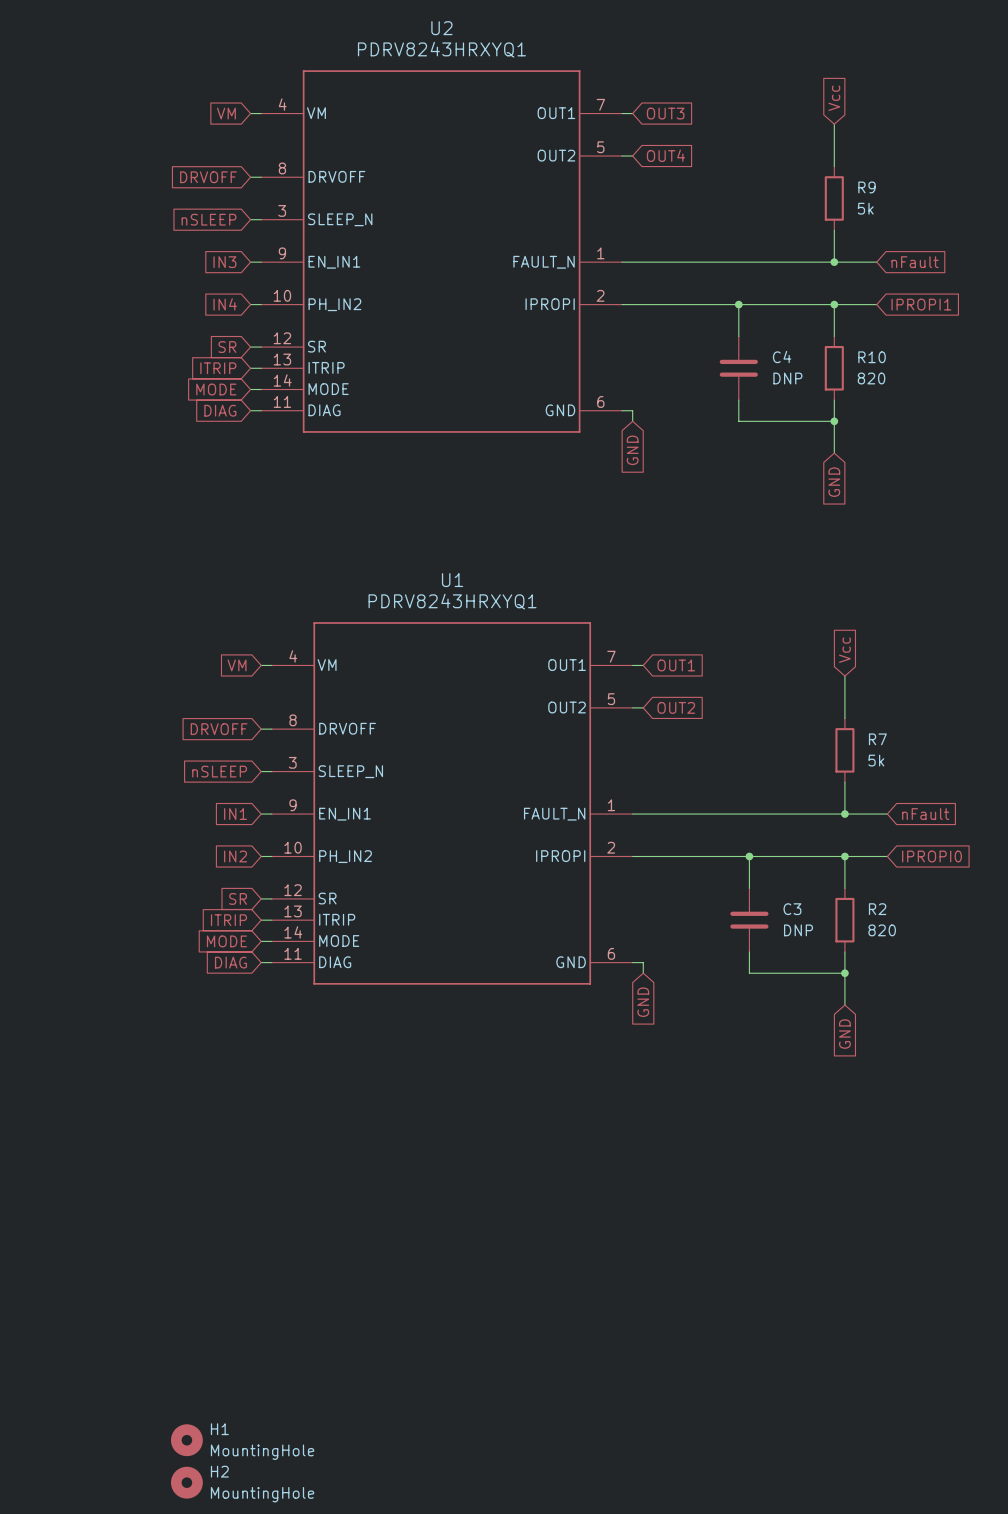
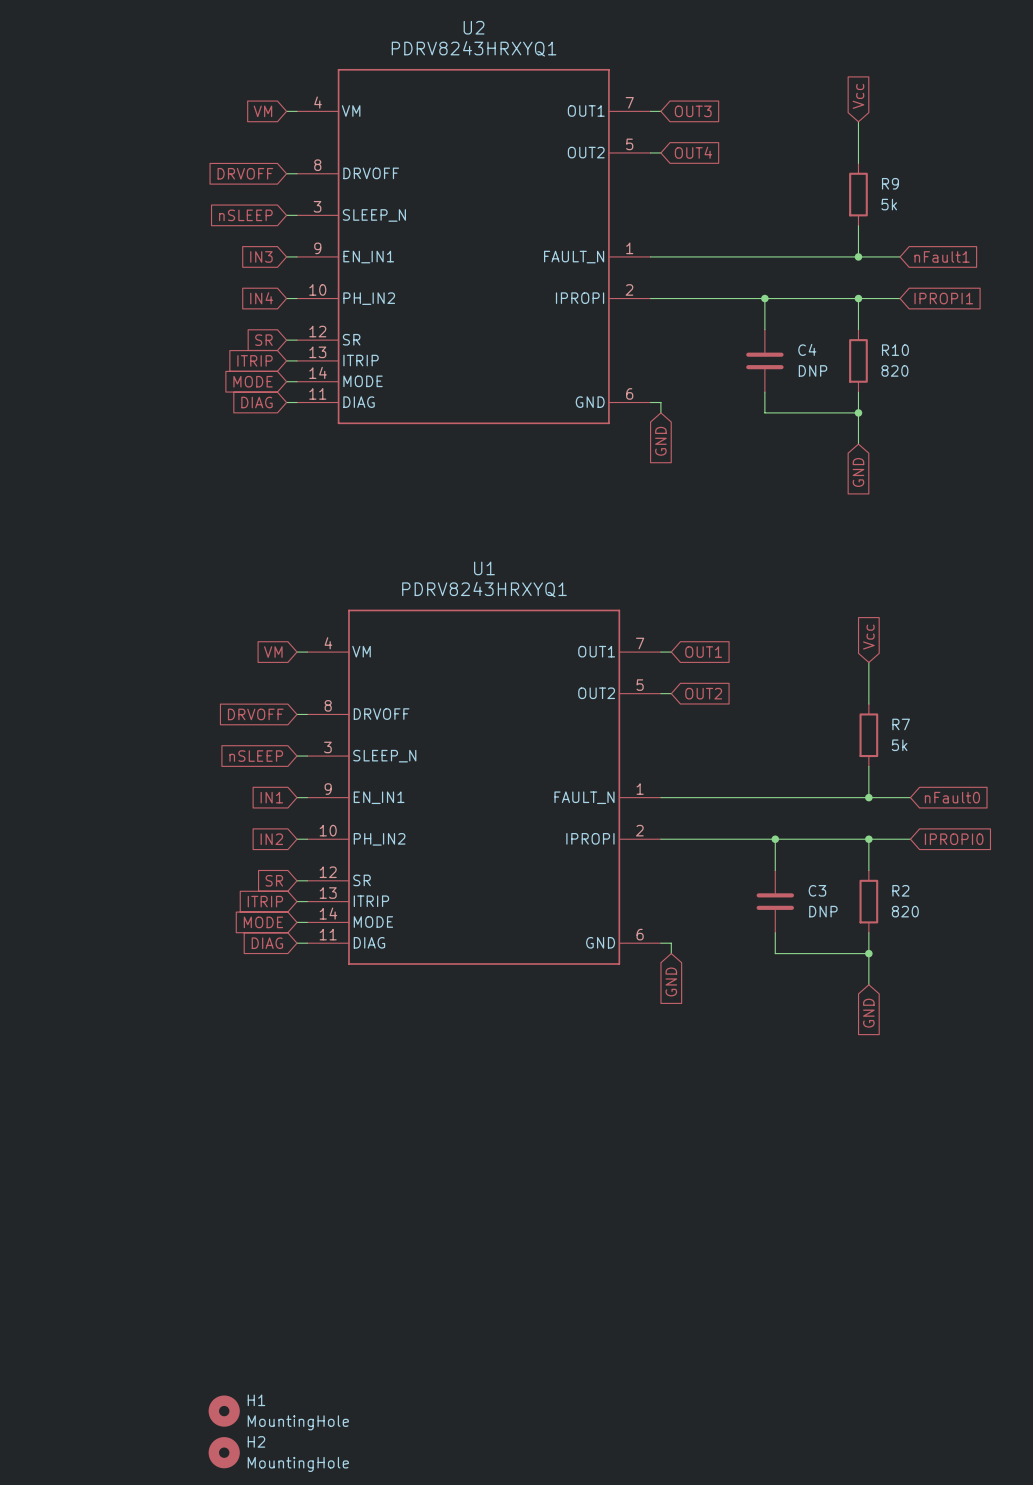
global label: nFault (915, 262) -> nFault1 (942, 256)
global label: nFault (925, 814) -> nFault0 (952, 797)

